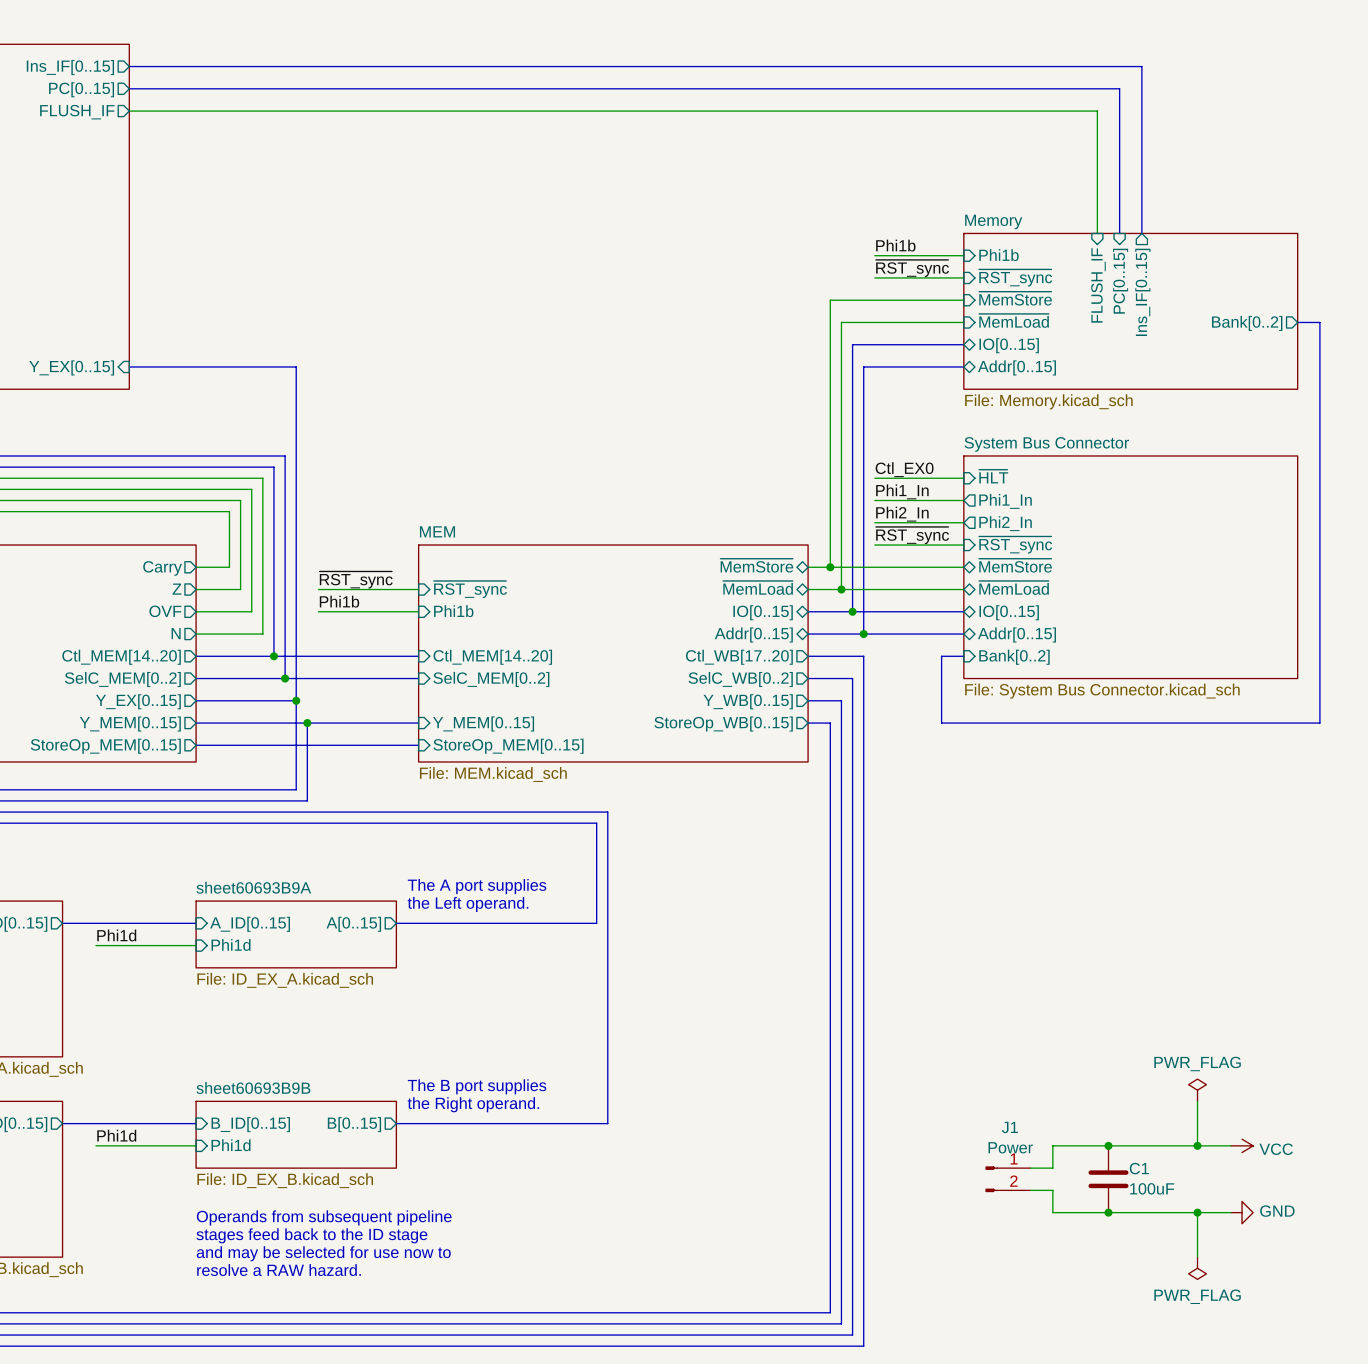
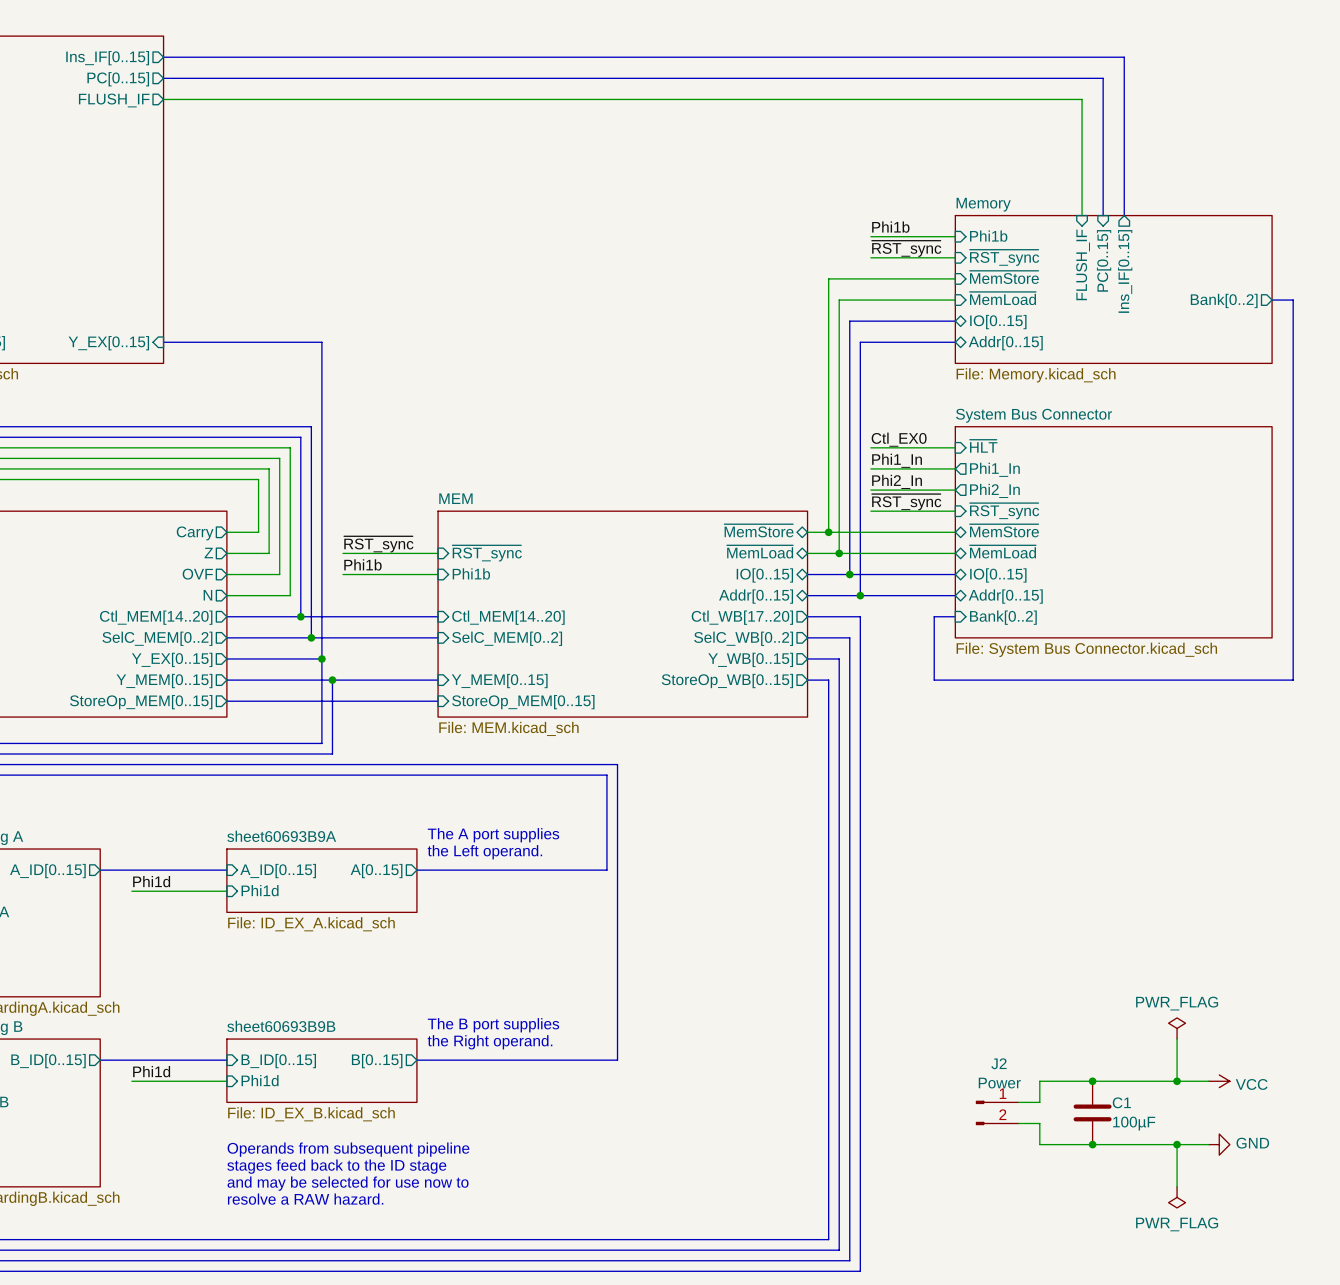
J1 name: J1 (1009, 1127) -> J2 (999, 1063)
C1 value: 100uF (1152, 1188) -> 100µF (1134, 1123)

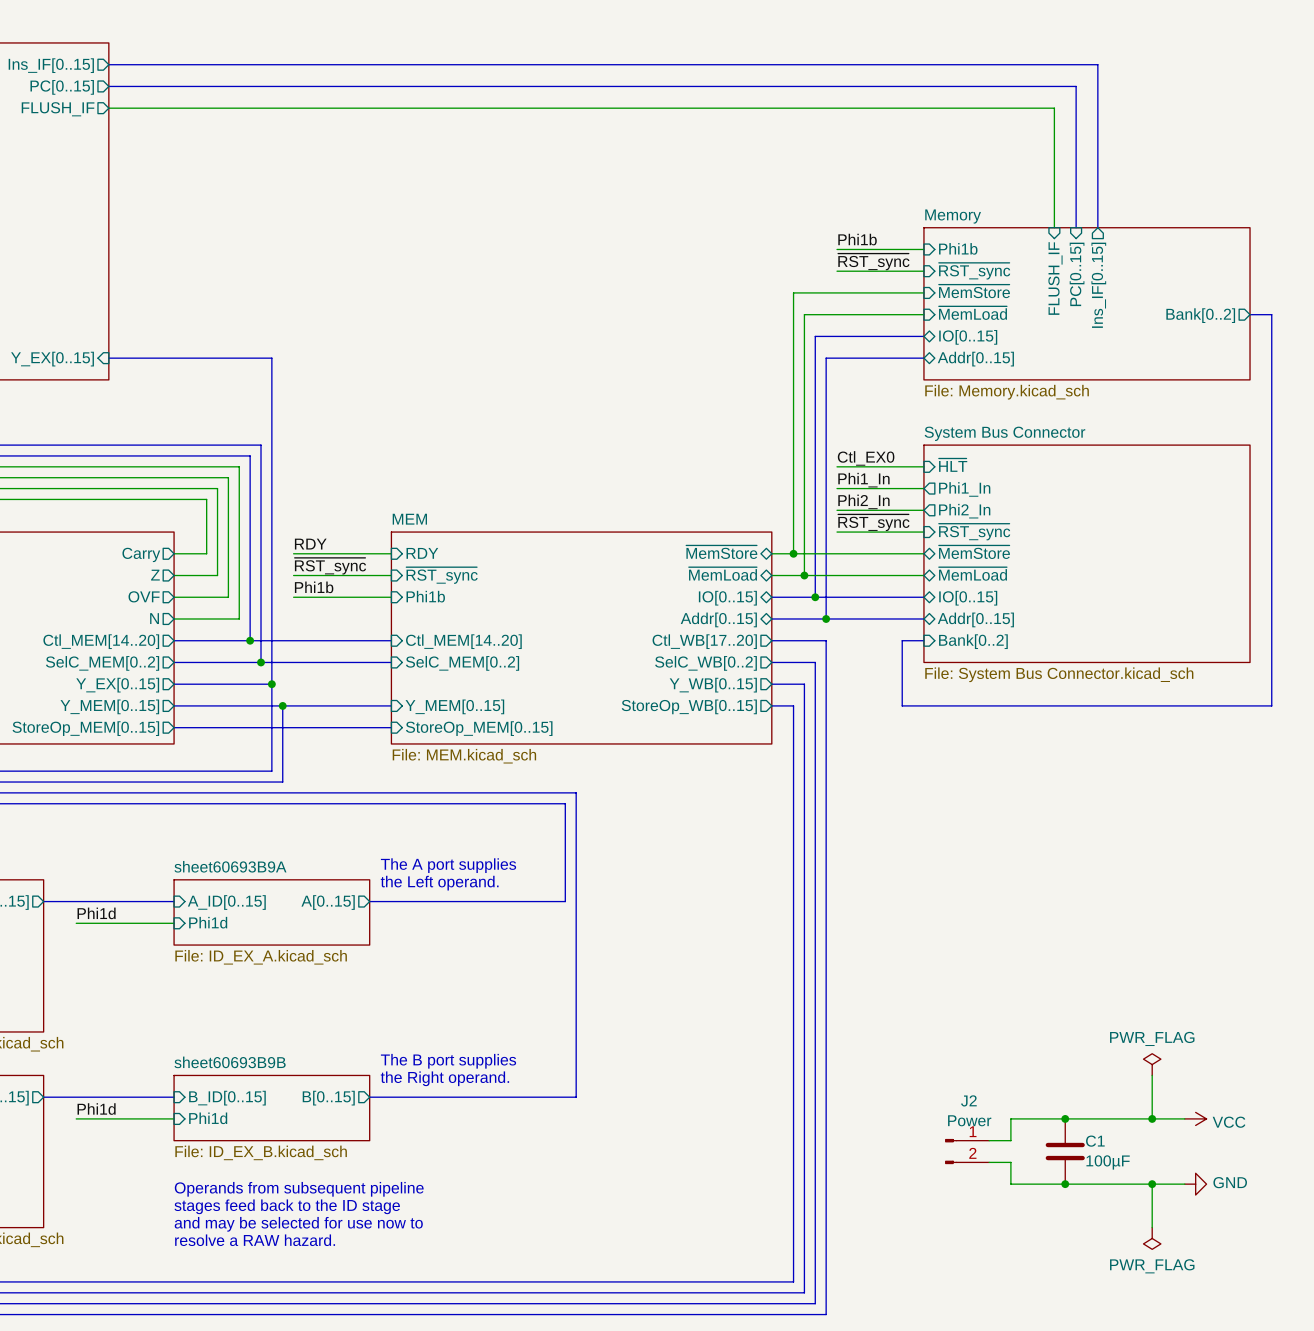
label: none -> RDY (310, 544)
sheet pin: none -> RDY (422, 553)
wire: none -> (293, 553) (391, 553)

